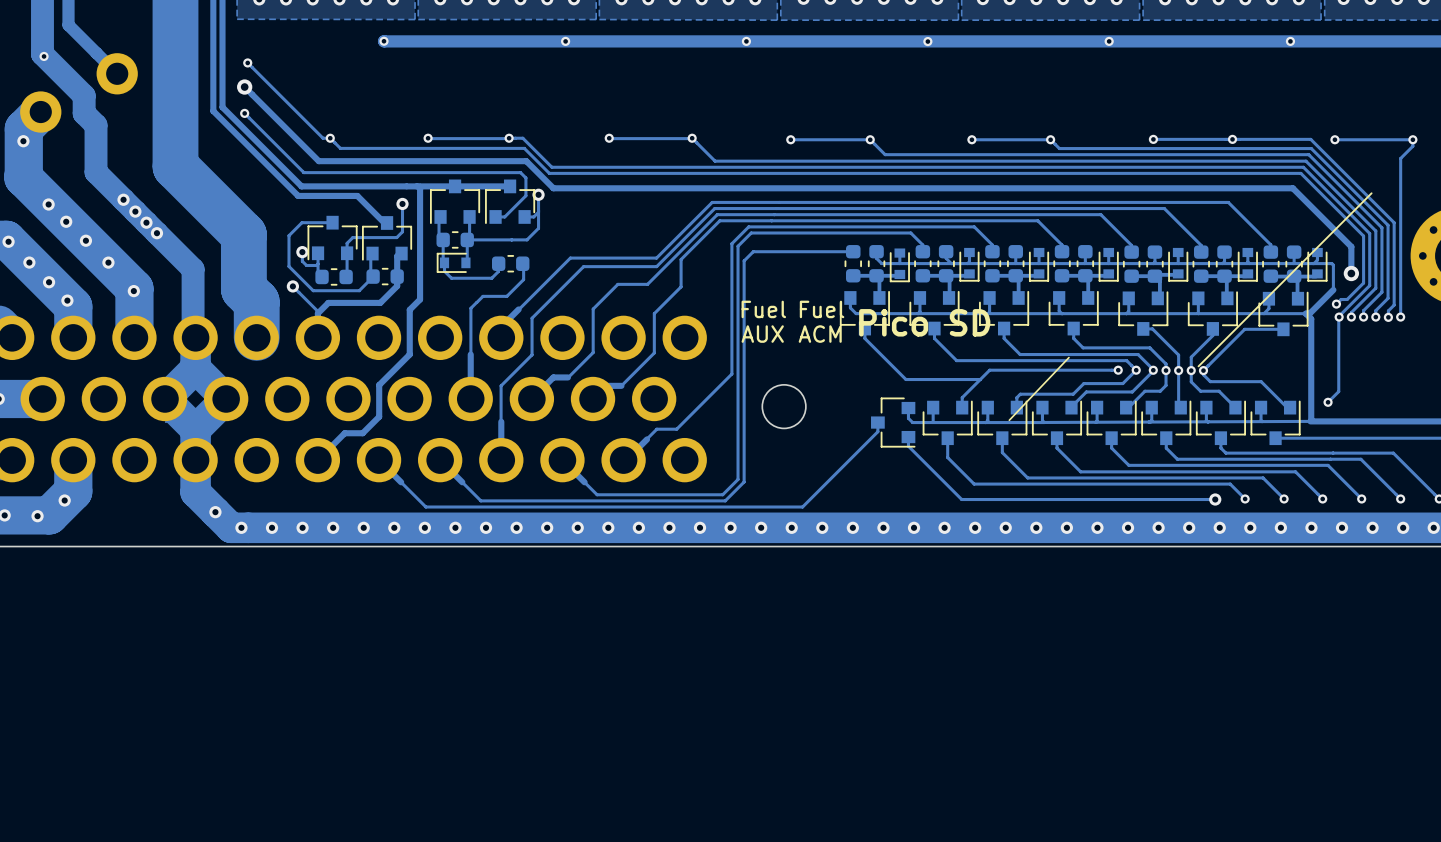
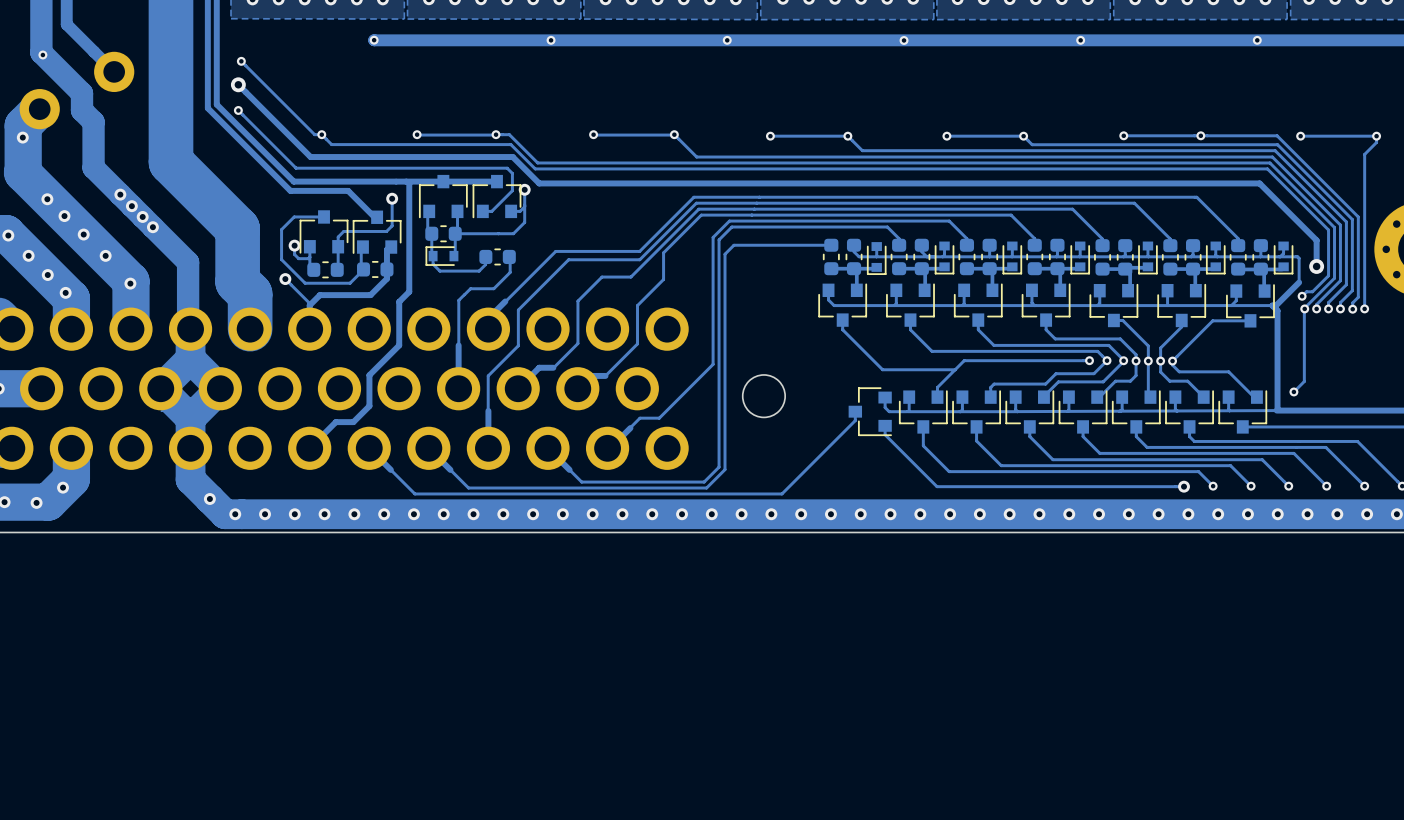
line: (1371, 193) (1198, 366) -> none
text: Fuel (763, 309) -> none
text: Fuel (822, 309) -> none
text: Pico SD (924, 322) -> none
text: AUX (762, 334) -> none
text: ACM (820, 334) -> none
line: (1068, 357) (1009, 420) -> none

